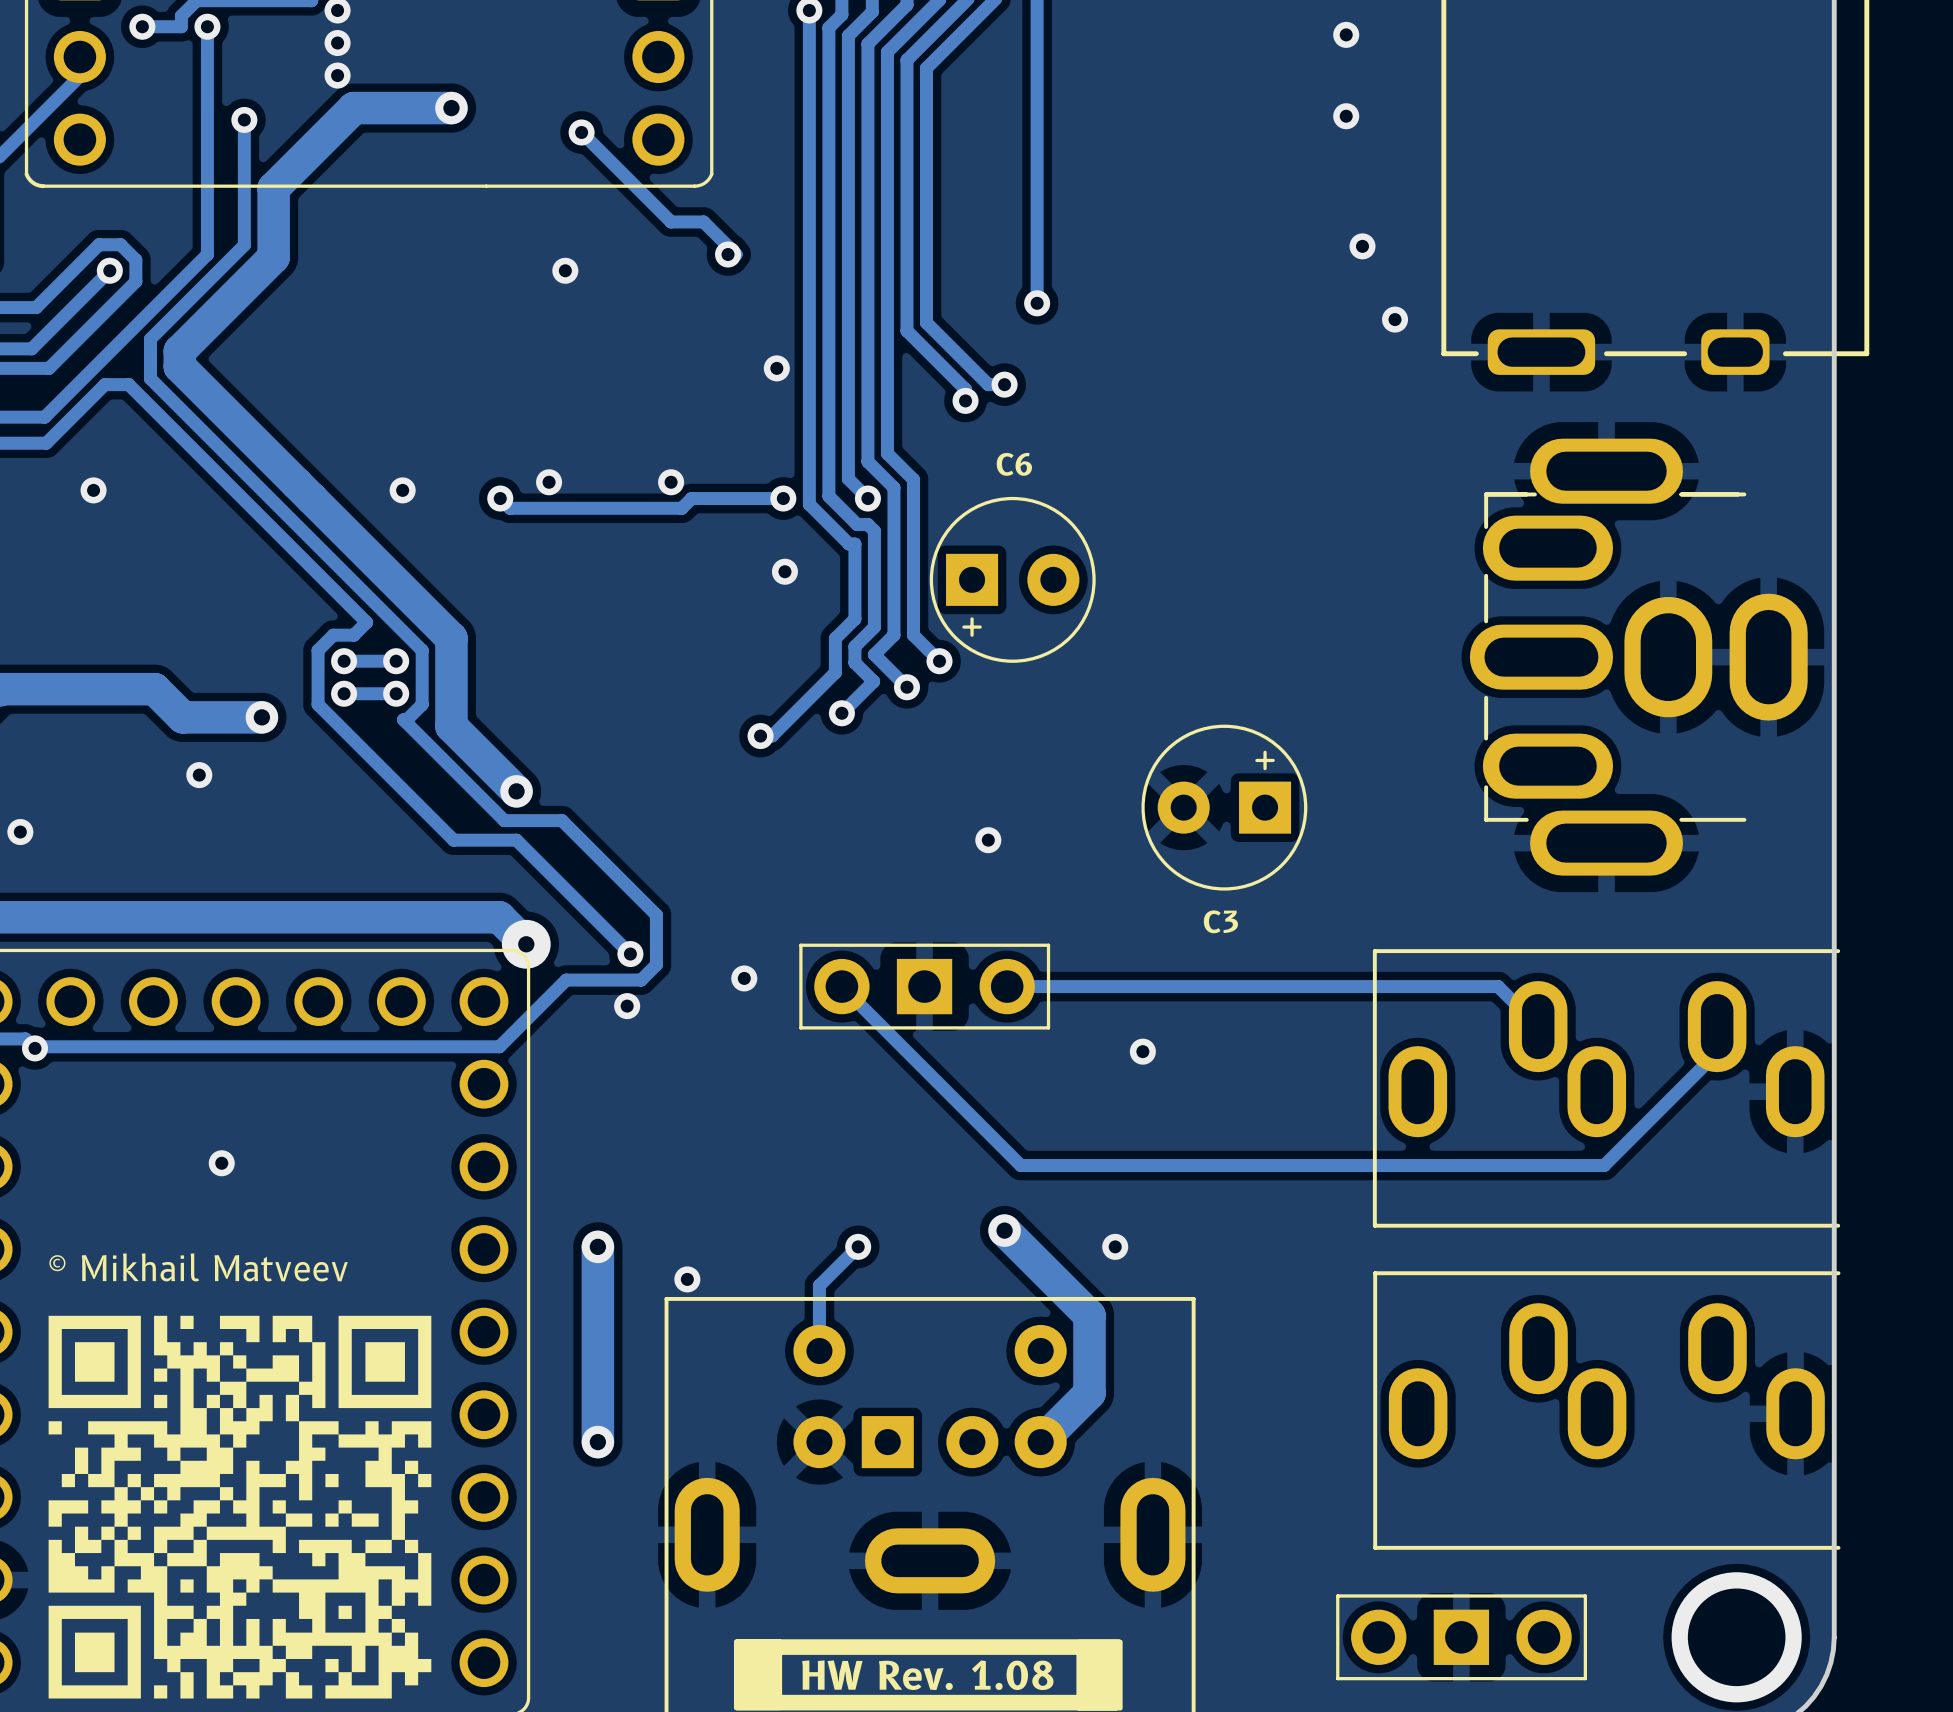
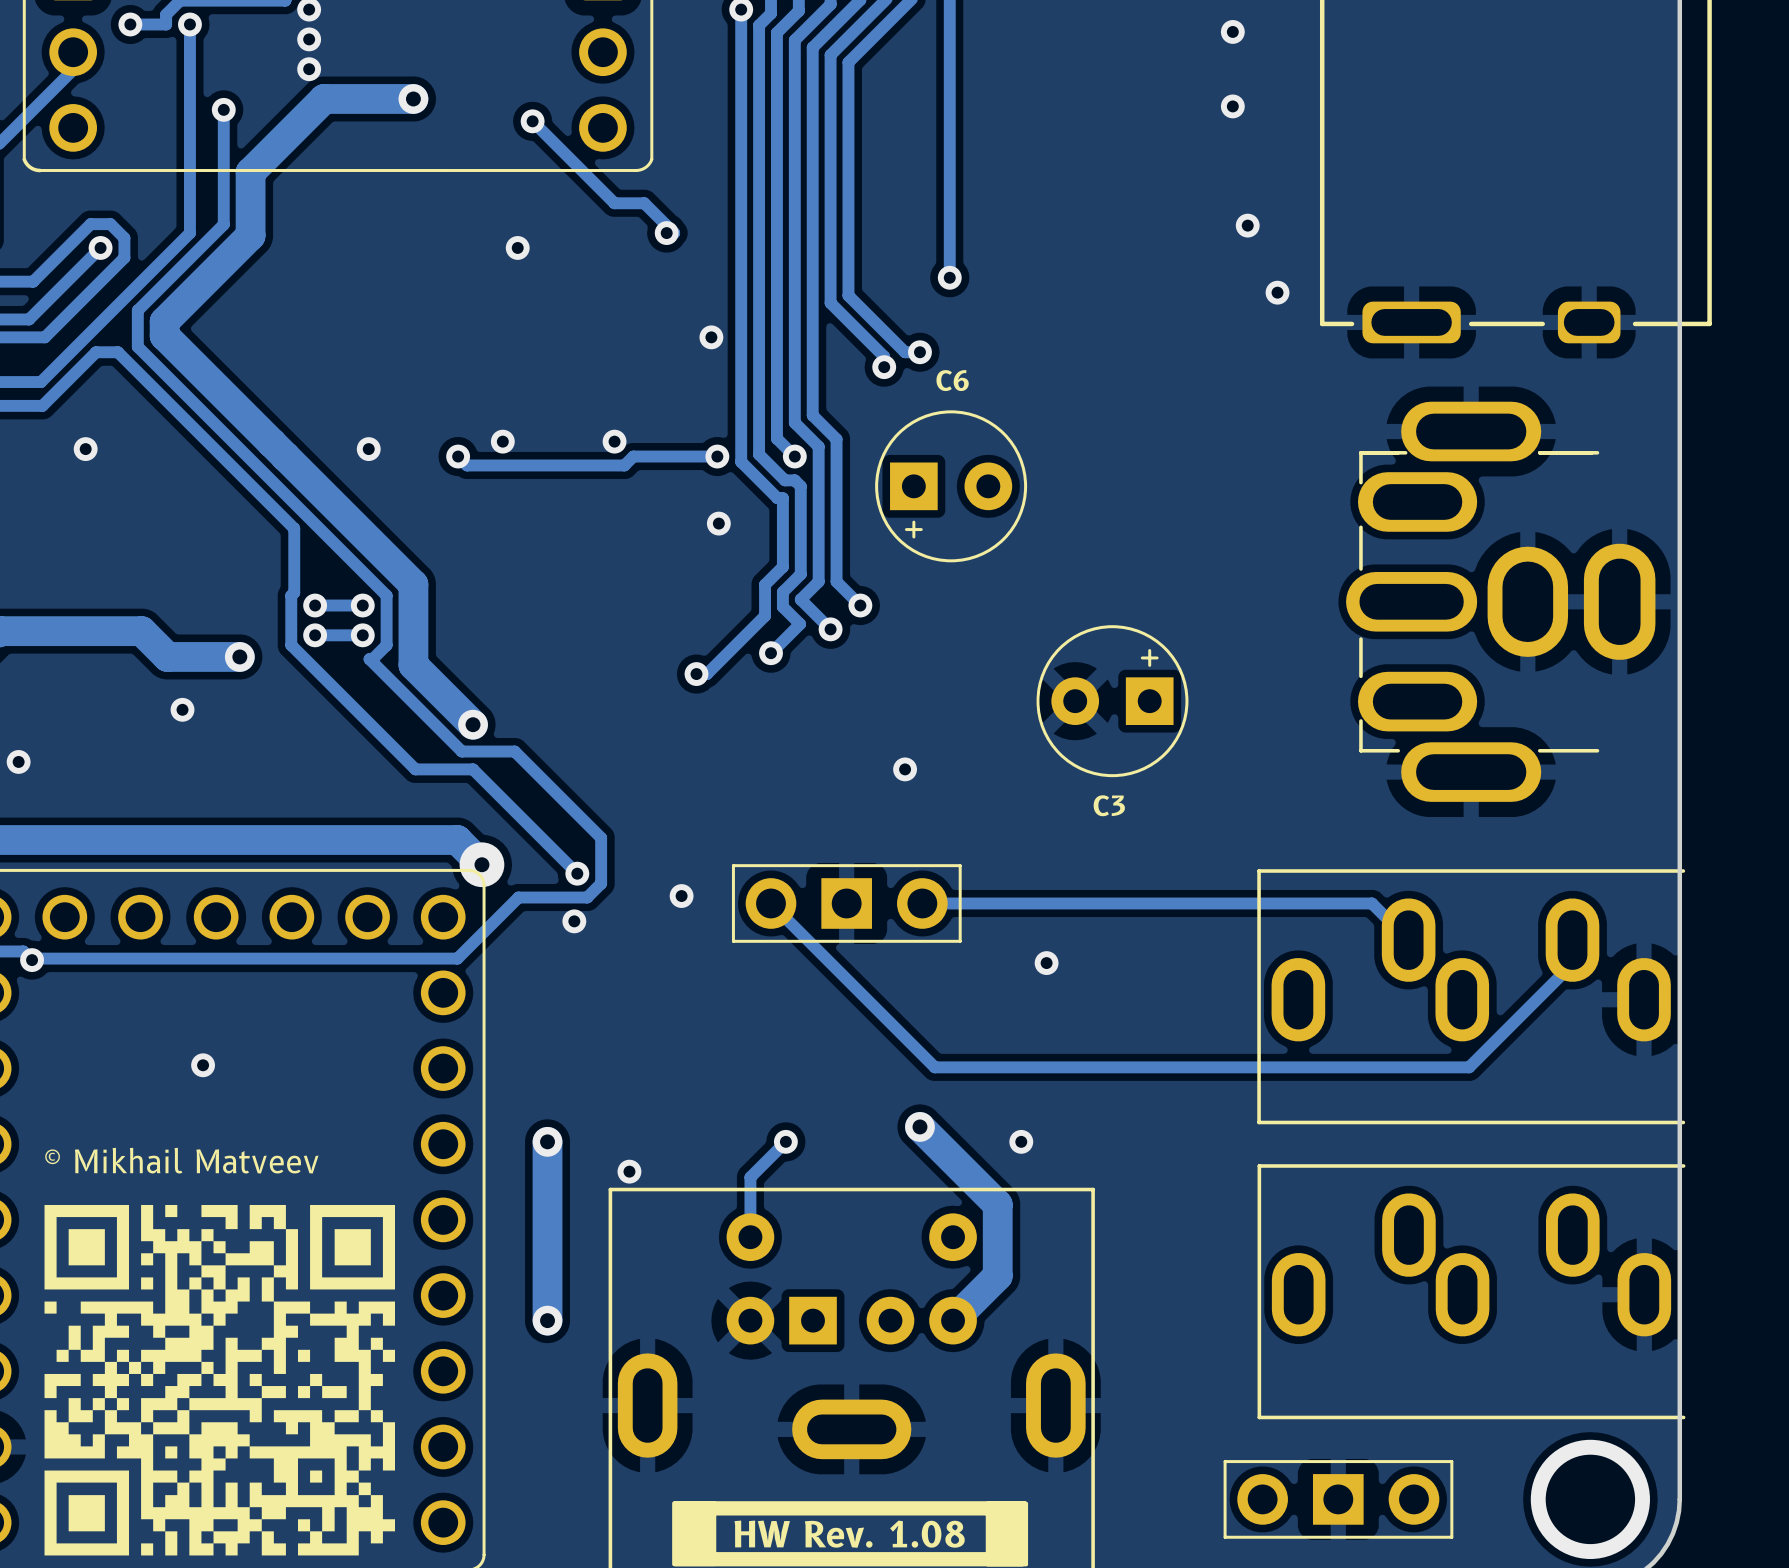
track: (321, 577) (366, 622) (353, 635) (333, 635) (321, 647) -> (294, 528) (294, 592)
C6 position: (1012, 579) -> (951, 486)
C3 position: (1224, 807) -> (1112, 701)

